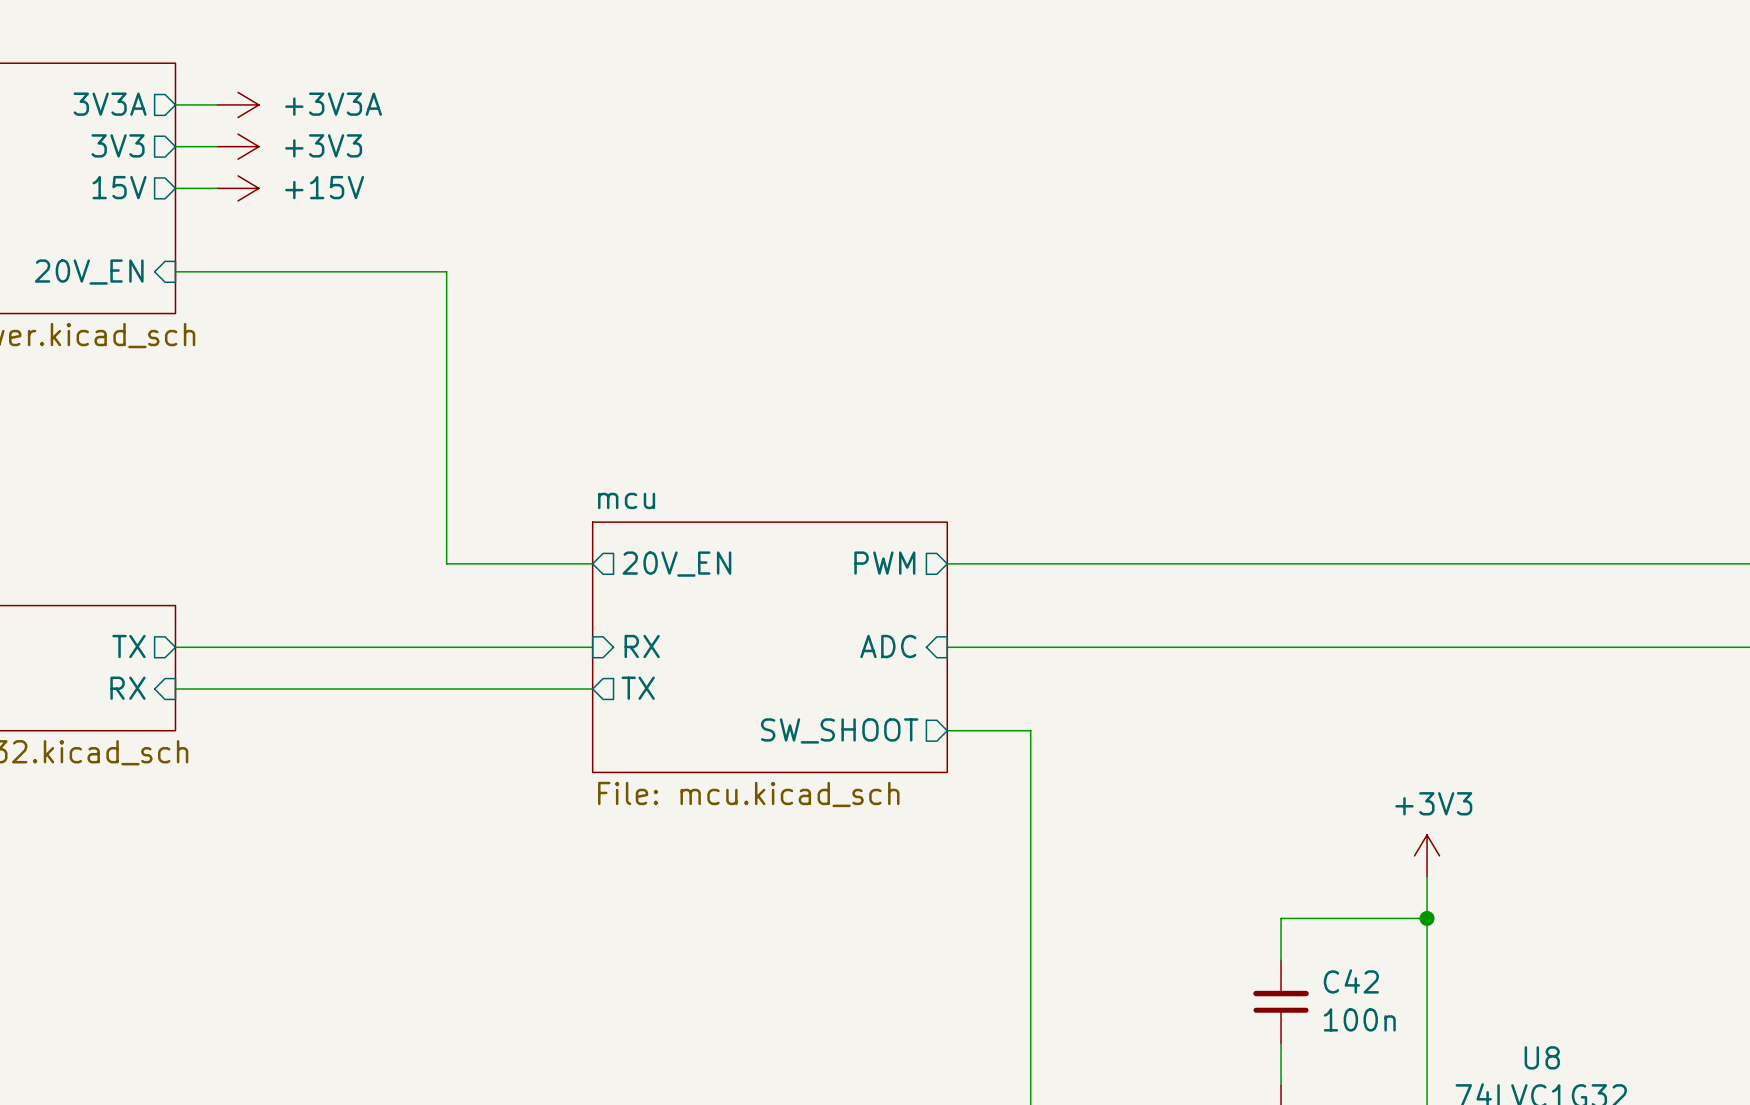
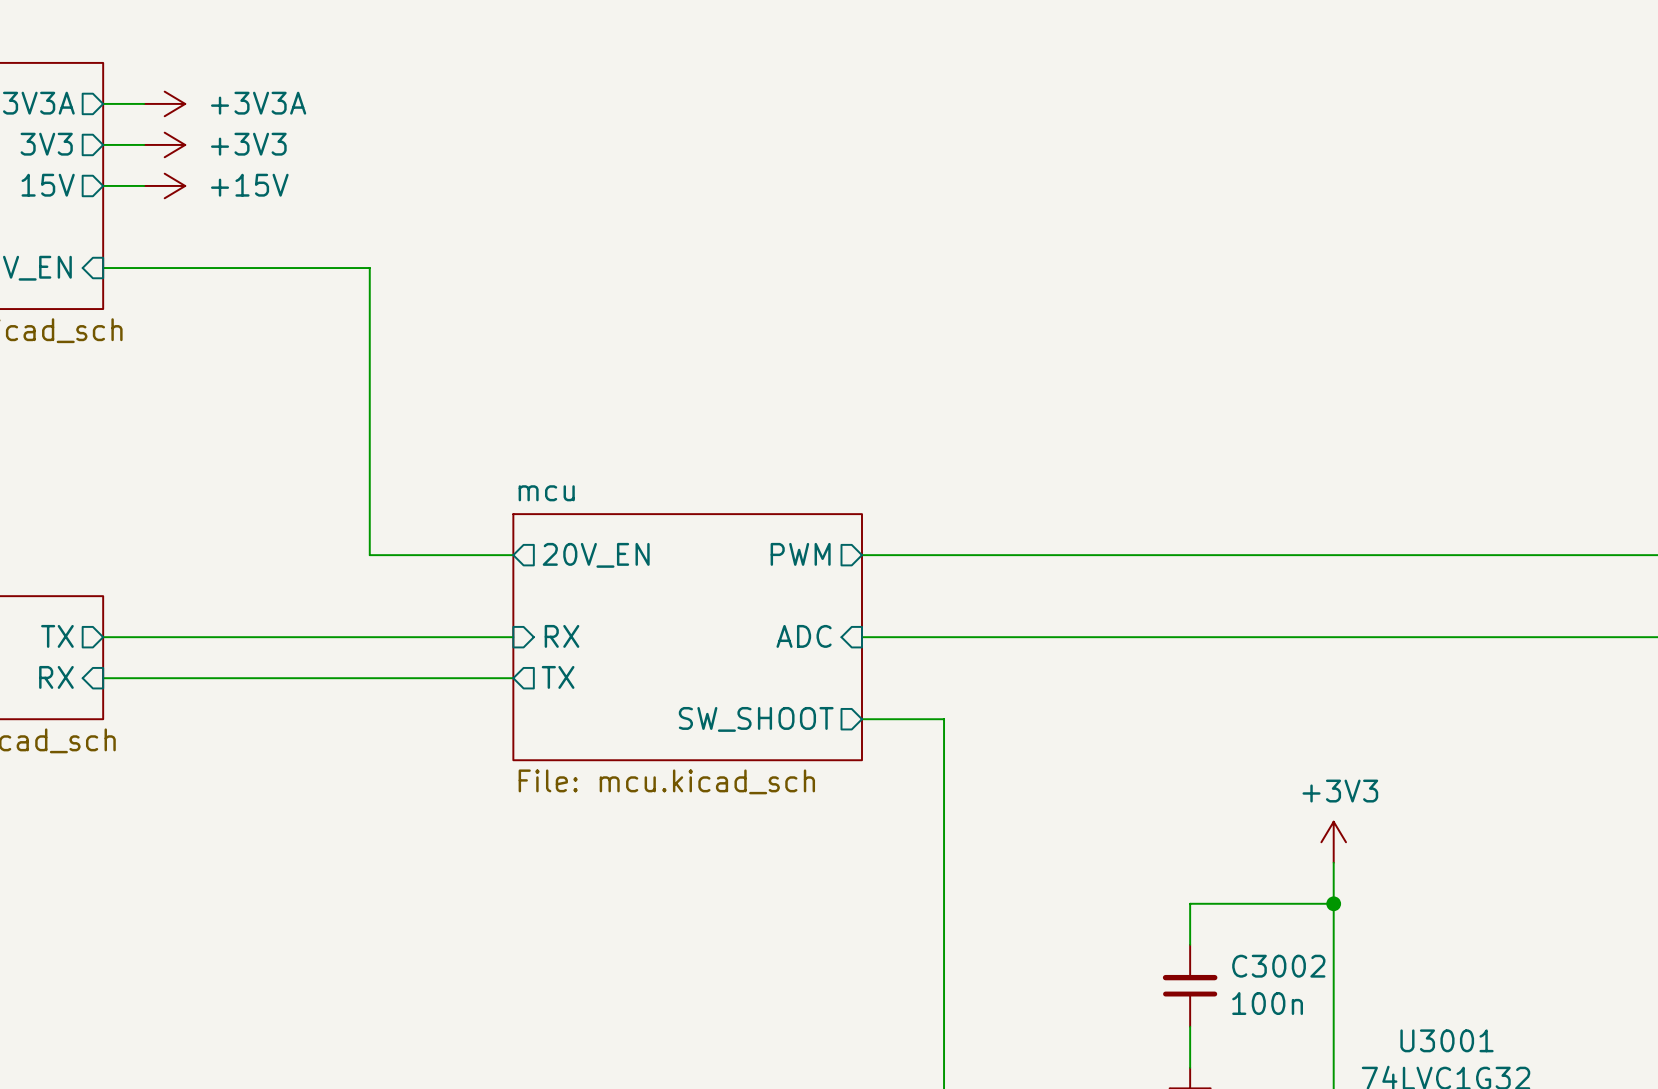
C42 name: C42 (1351, 981) -> C3002 (1278, 966)
U8 name: U8 (1542, 1057) -> U3001 (1446, 1040)

